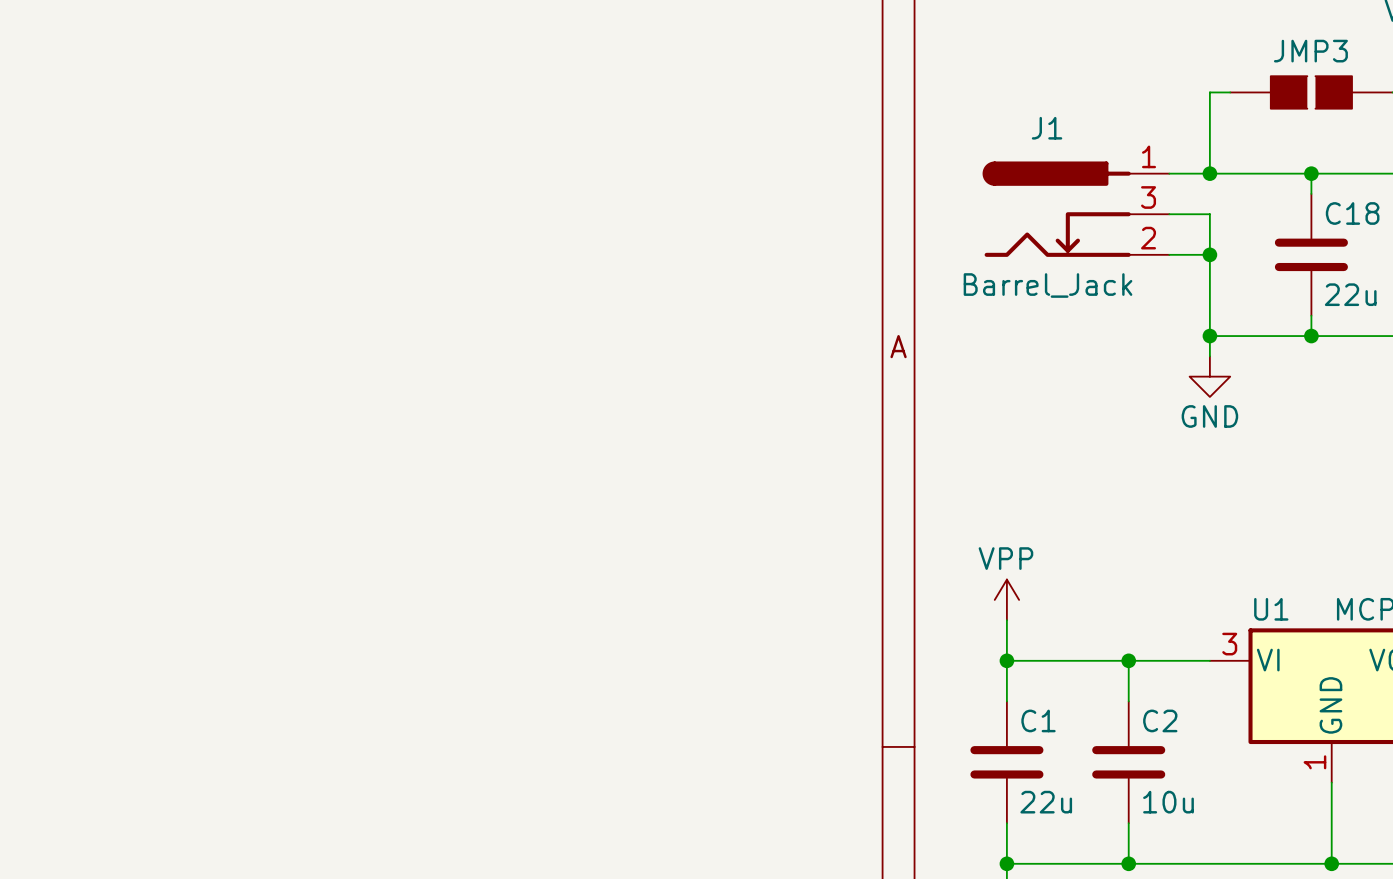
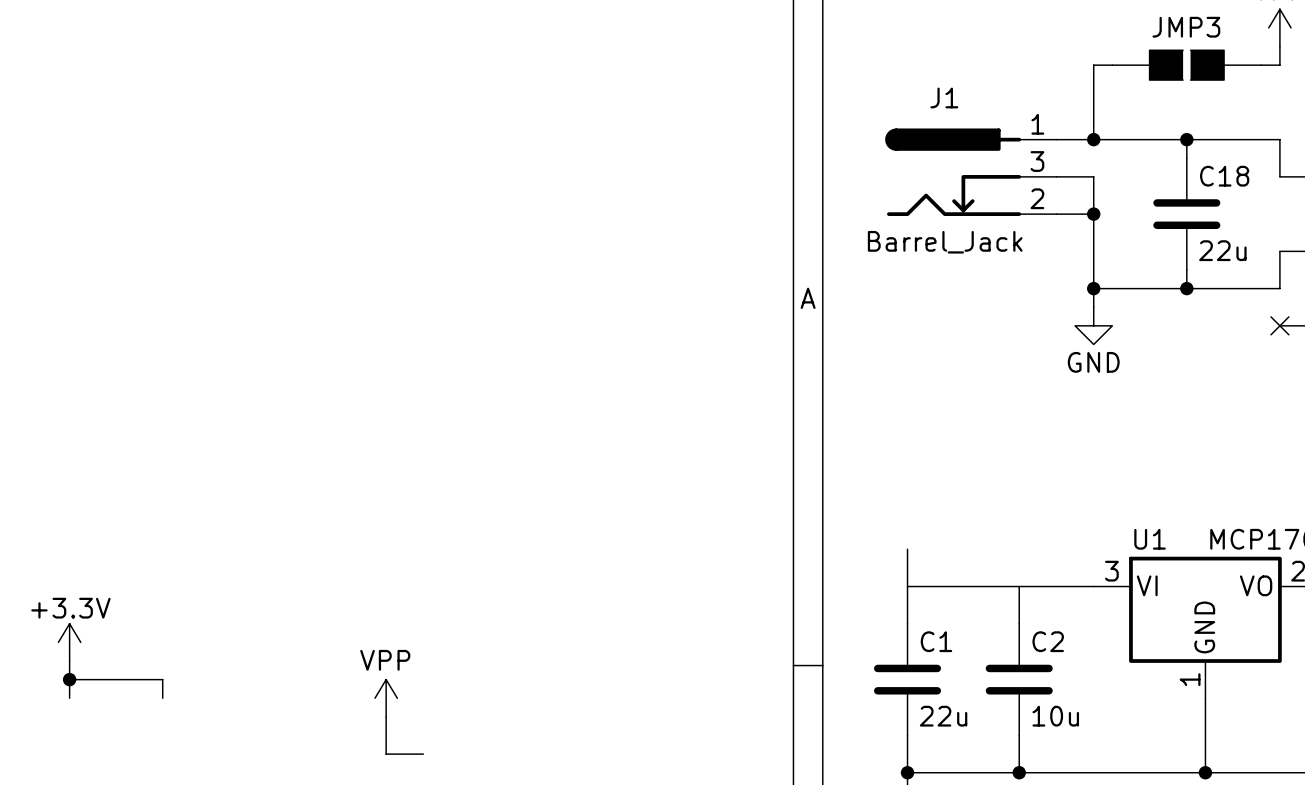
power symbol: VPP (1006, 599) -> none
junction: (1006, 660) -> none
junction: (1128, 660) -> none
power symbol: none -> +3.3V (69, 642)
wire: none -> (69, 661) (69, 698)
wire: none -> (69, 679) (162, 679) (162, 698)
junction: none -> (69, 679)
power symbol: none -> VPP (386, 698)
wire: none -> (386, 716) (386, 754) (423, 754)

